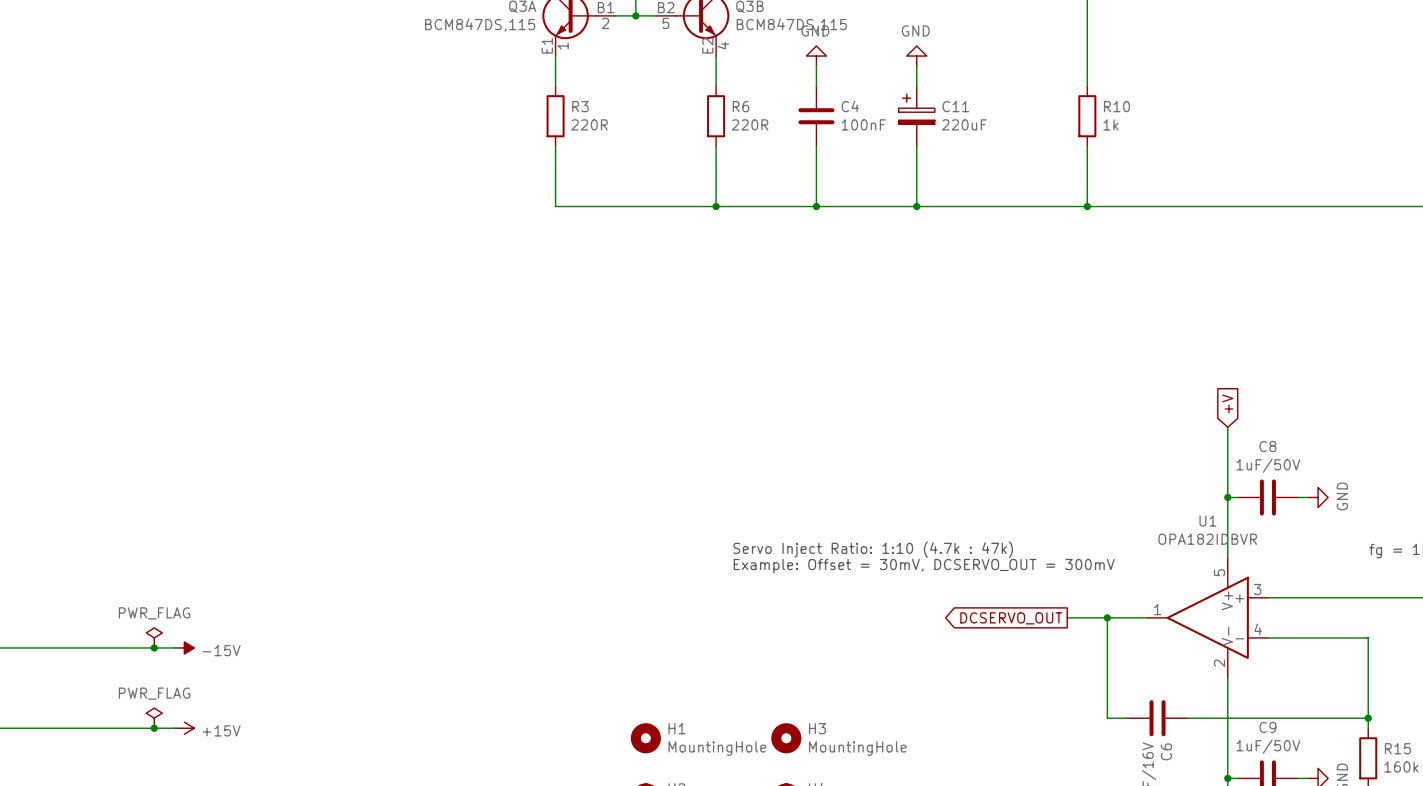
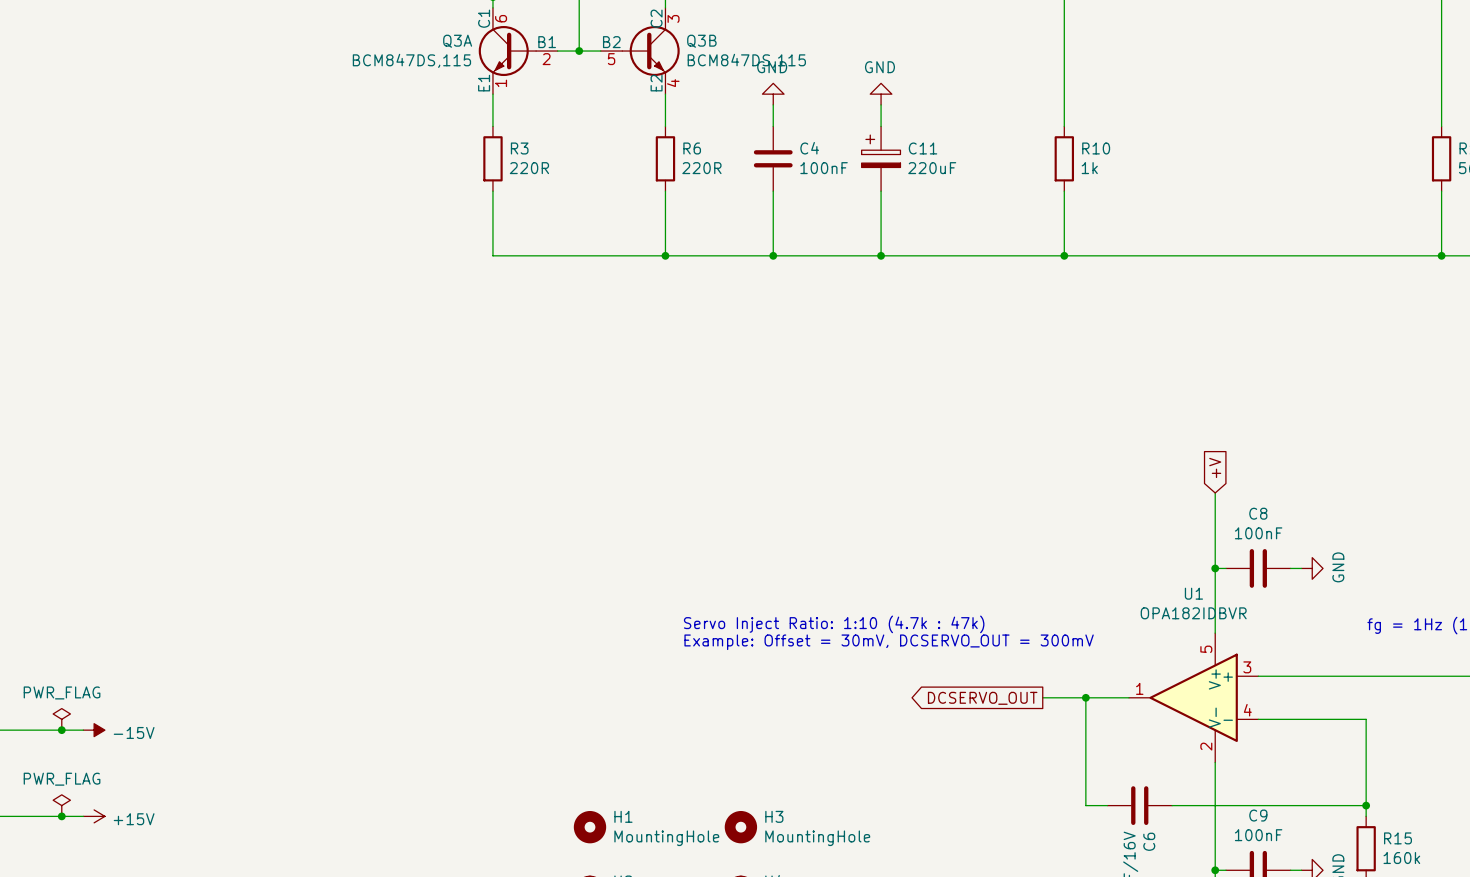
C8 value: 1uF/50V (1268, 465) -> 100nF (1258, 533)
C9 value: 1uF/50V (1268, 746) -> 100nF (1258, 835)

